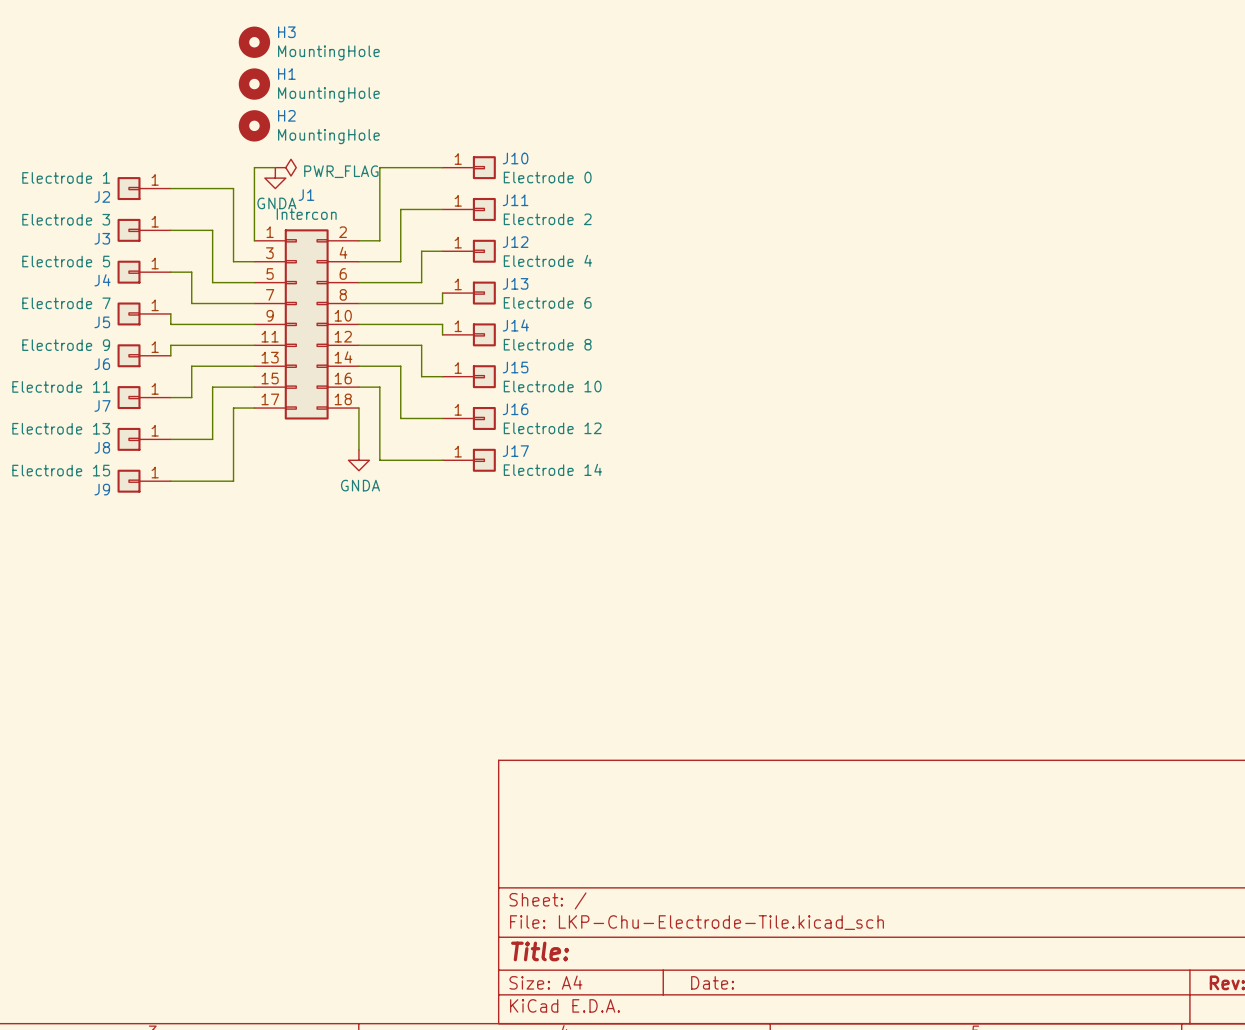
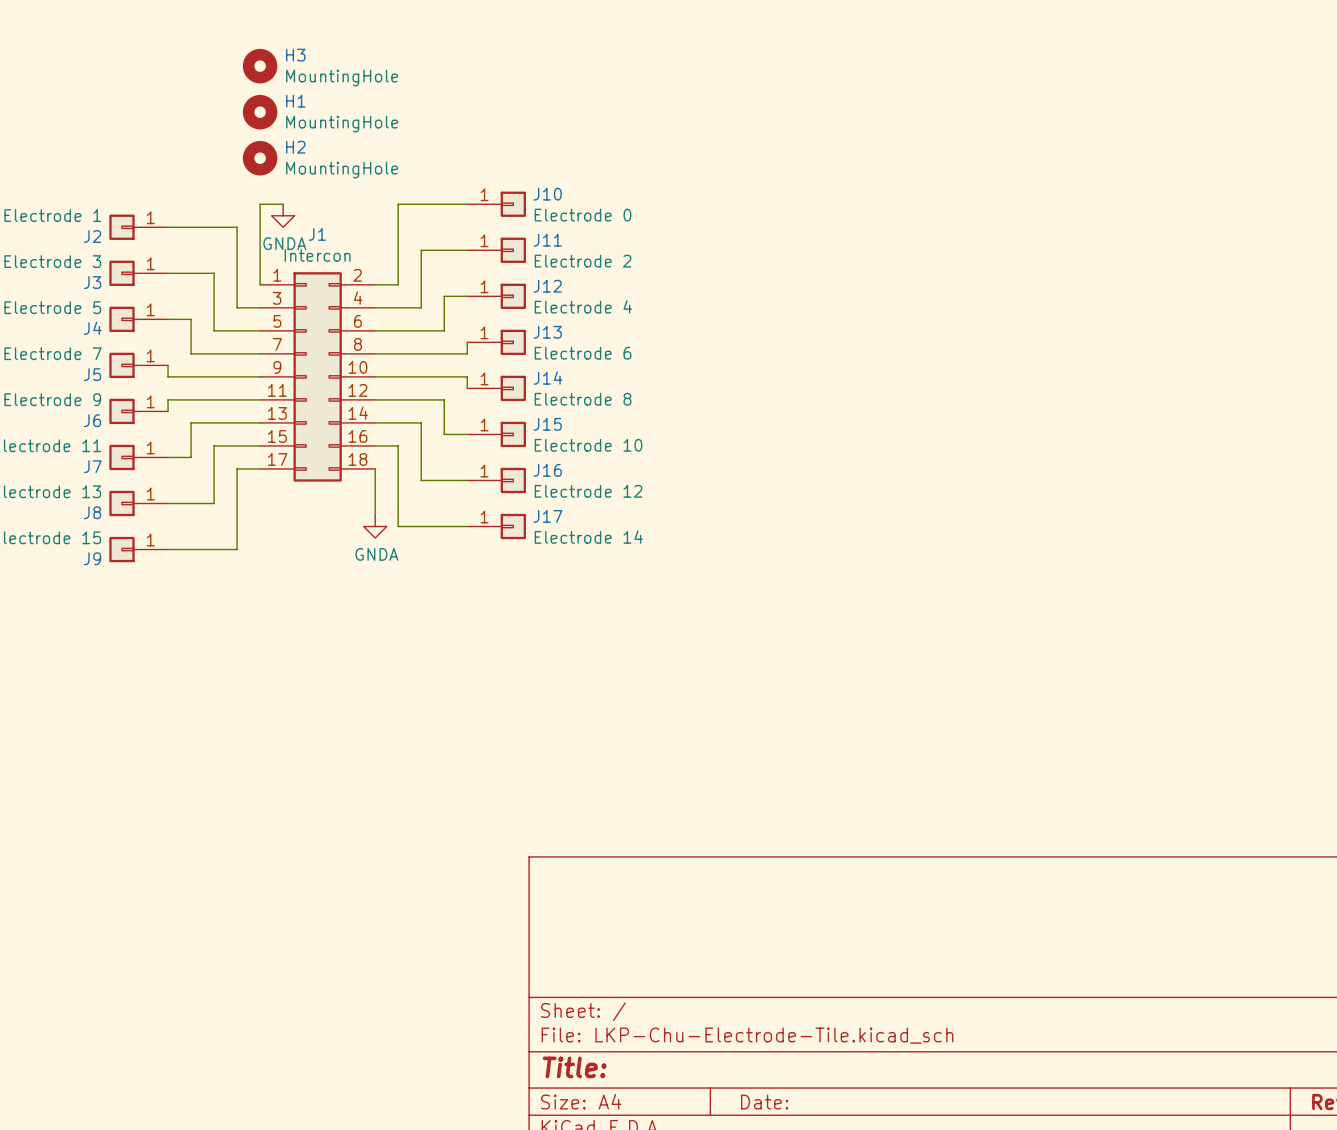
power symbol: PWR_FLAG (285, 167) -> none

